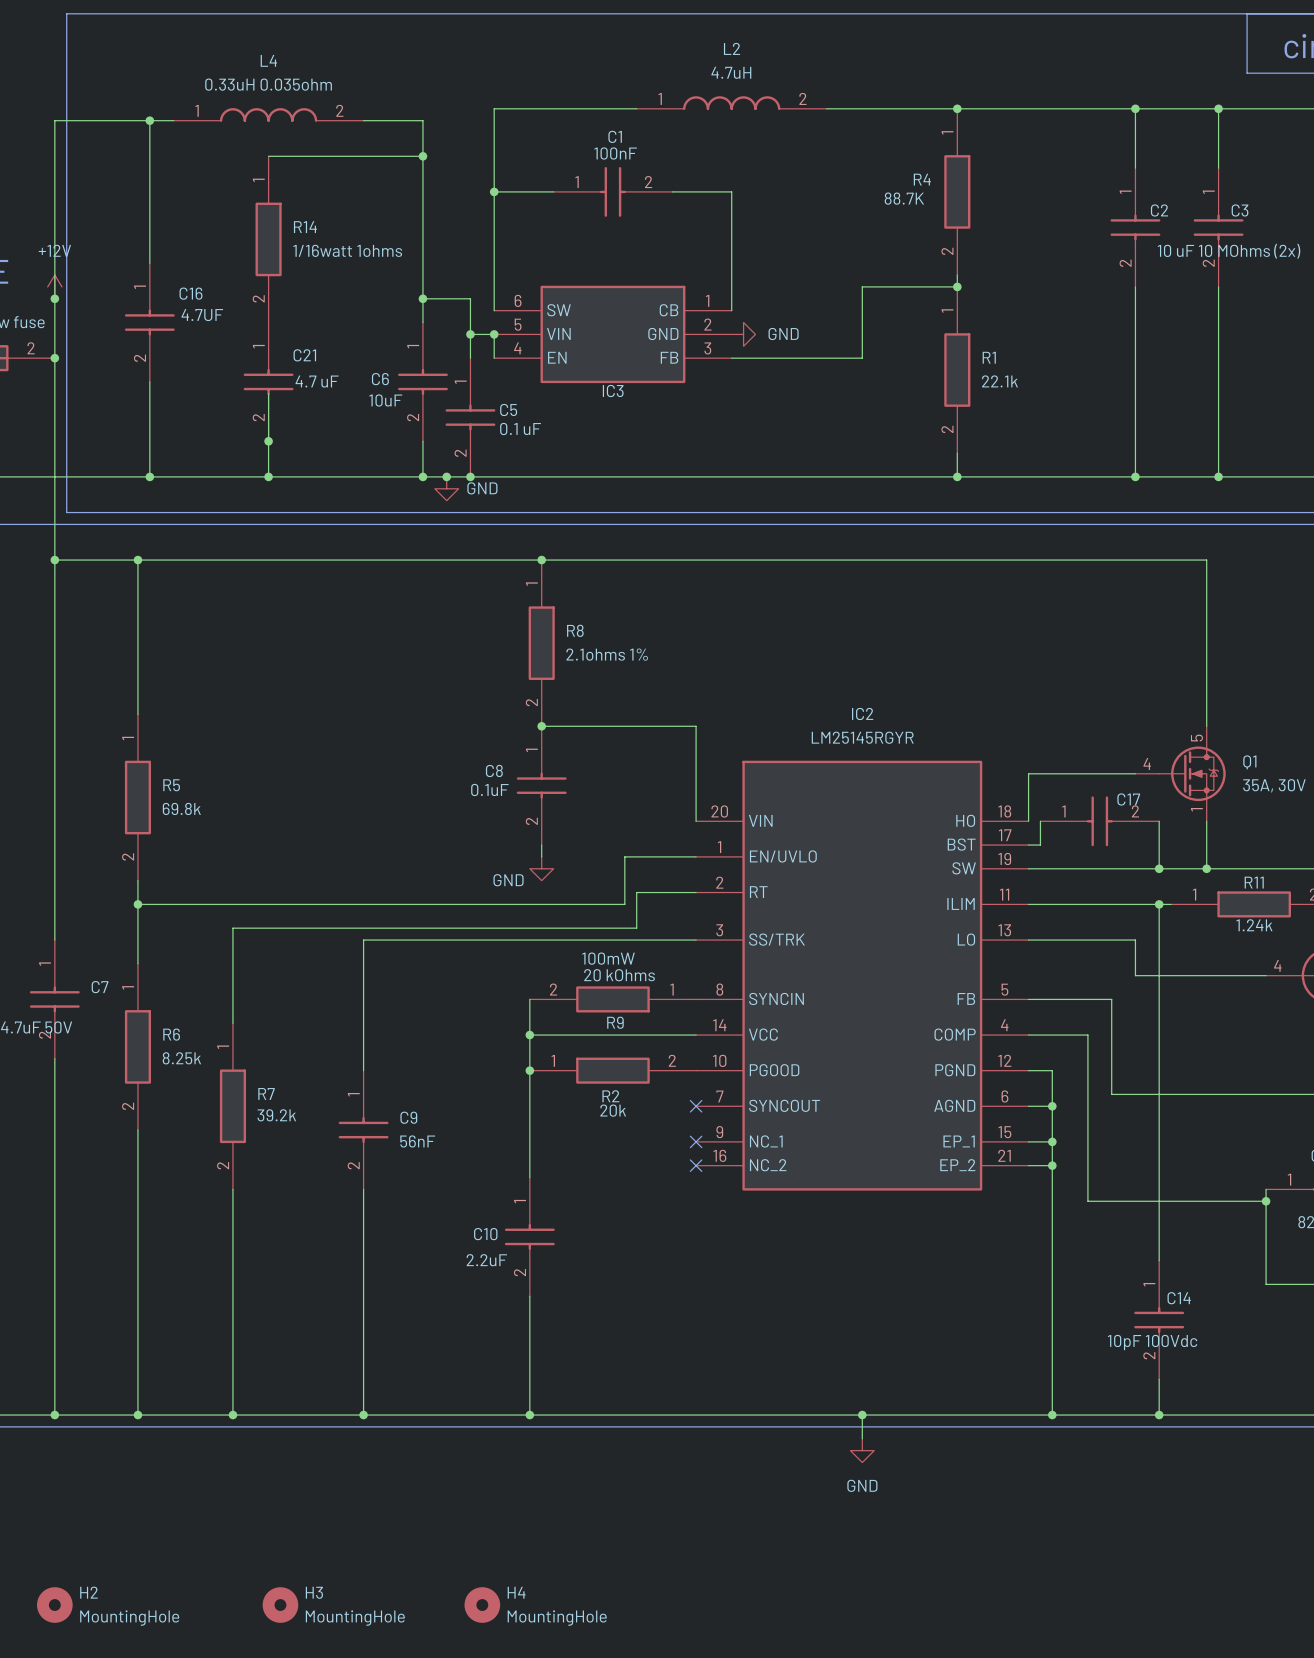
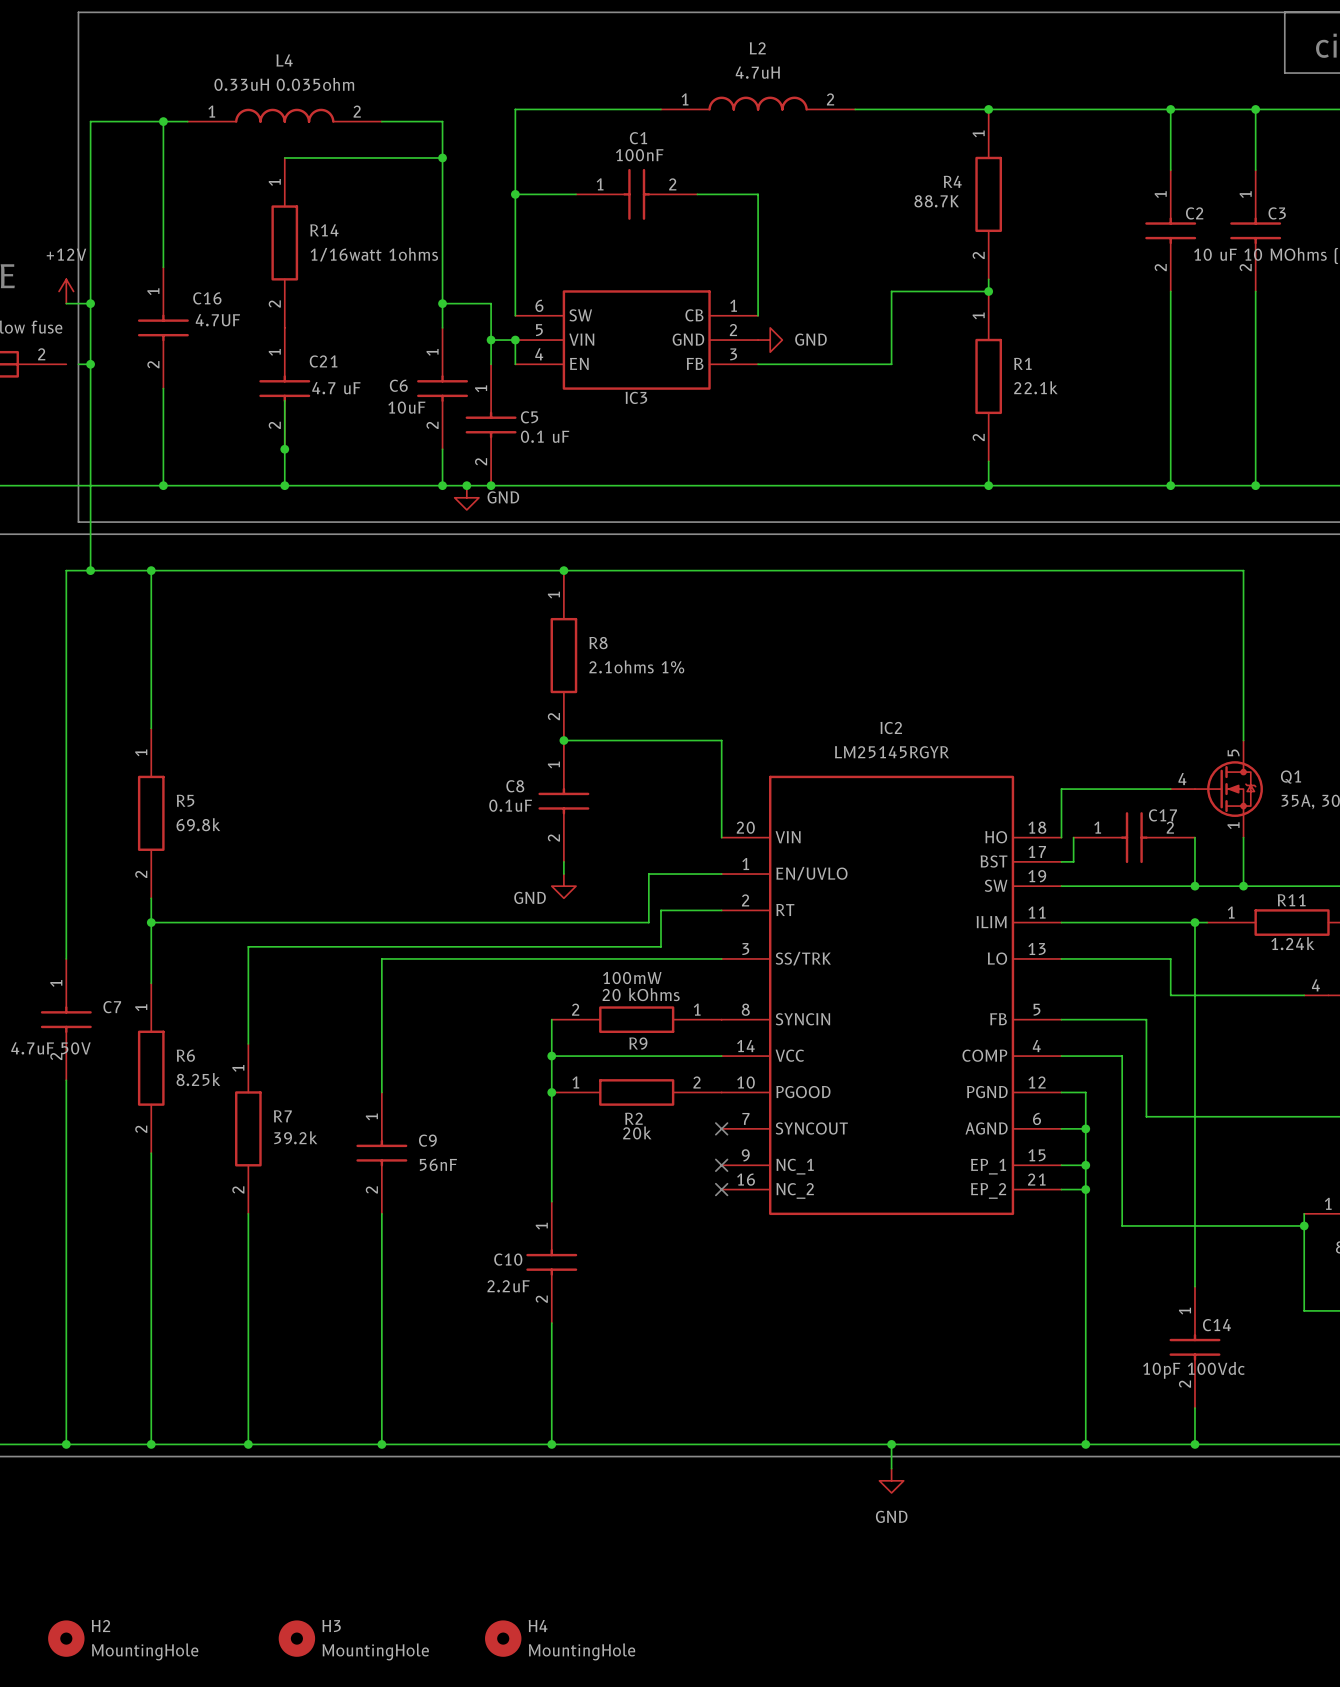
wire: (78, 120) (54, 120) (54, 560) -> (90, 121) (90, 570)
wire: none -> (66, 303) (90, 303)
junction position: (54, 298) -> (90, 303)
junction position: (54, 358) -> (90, 364)
wire: none -> (78, 364) (90, 364)
junction position: (54, 560) -> (90, 570)

